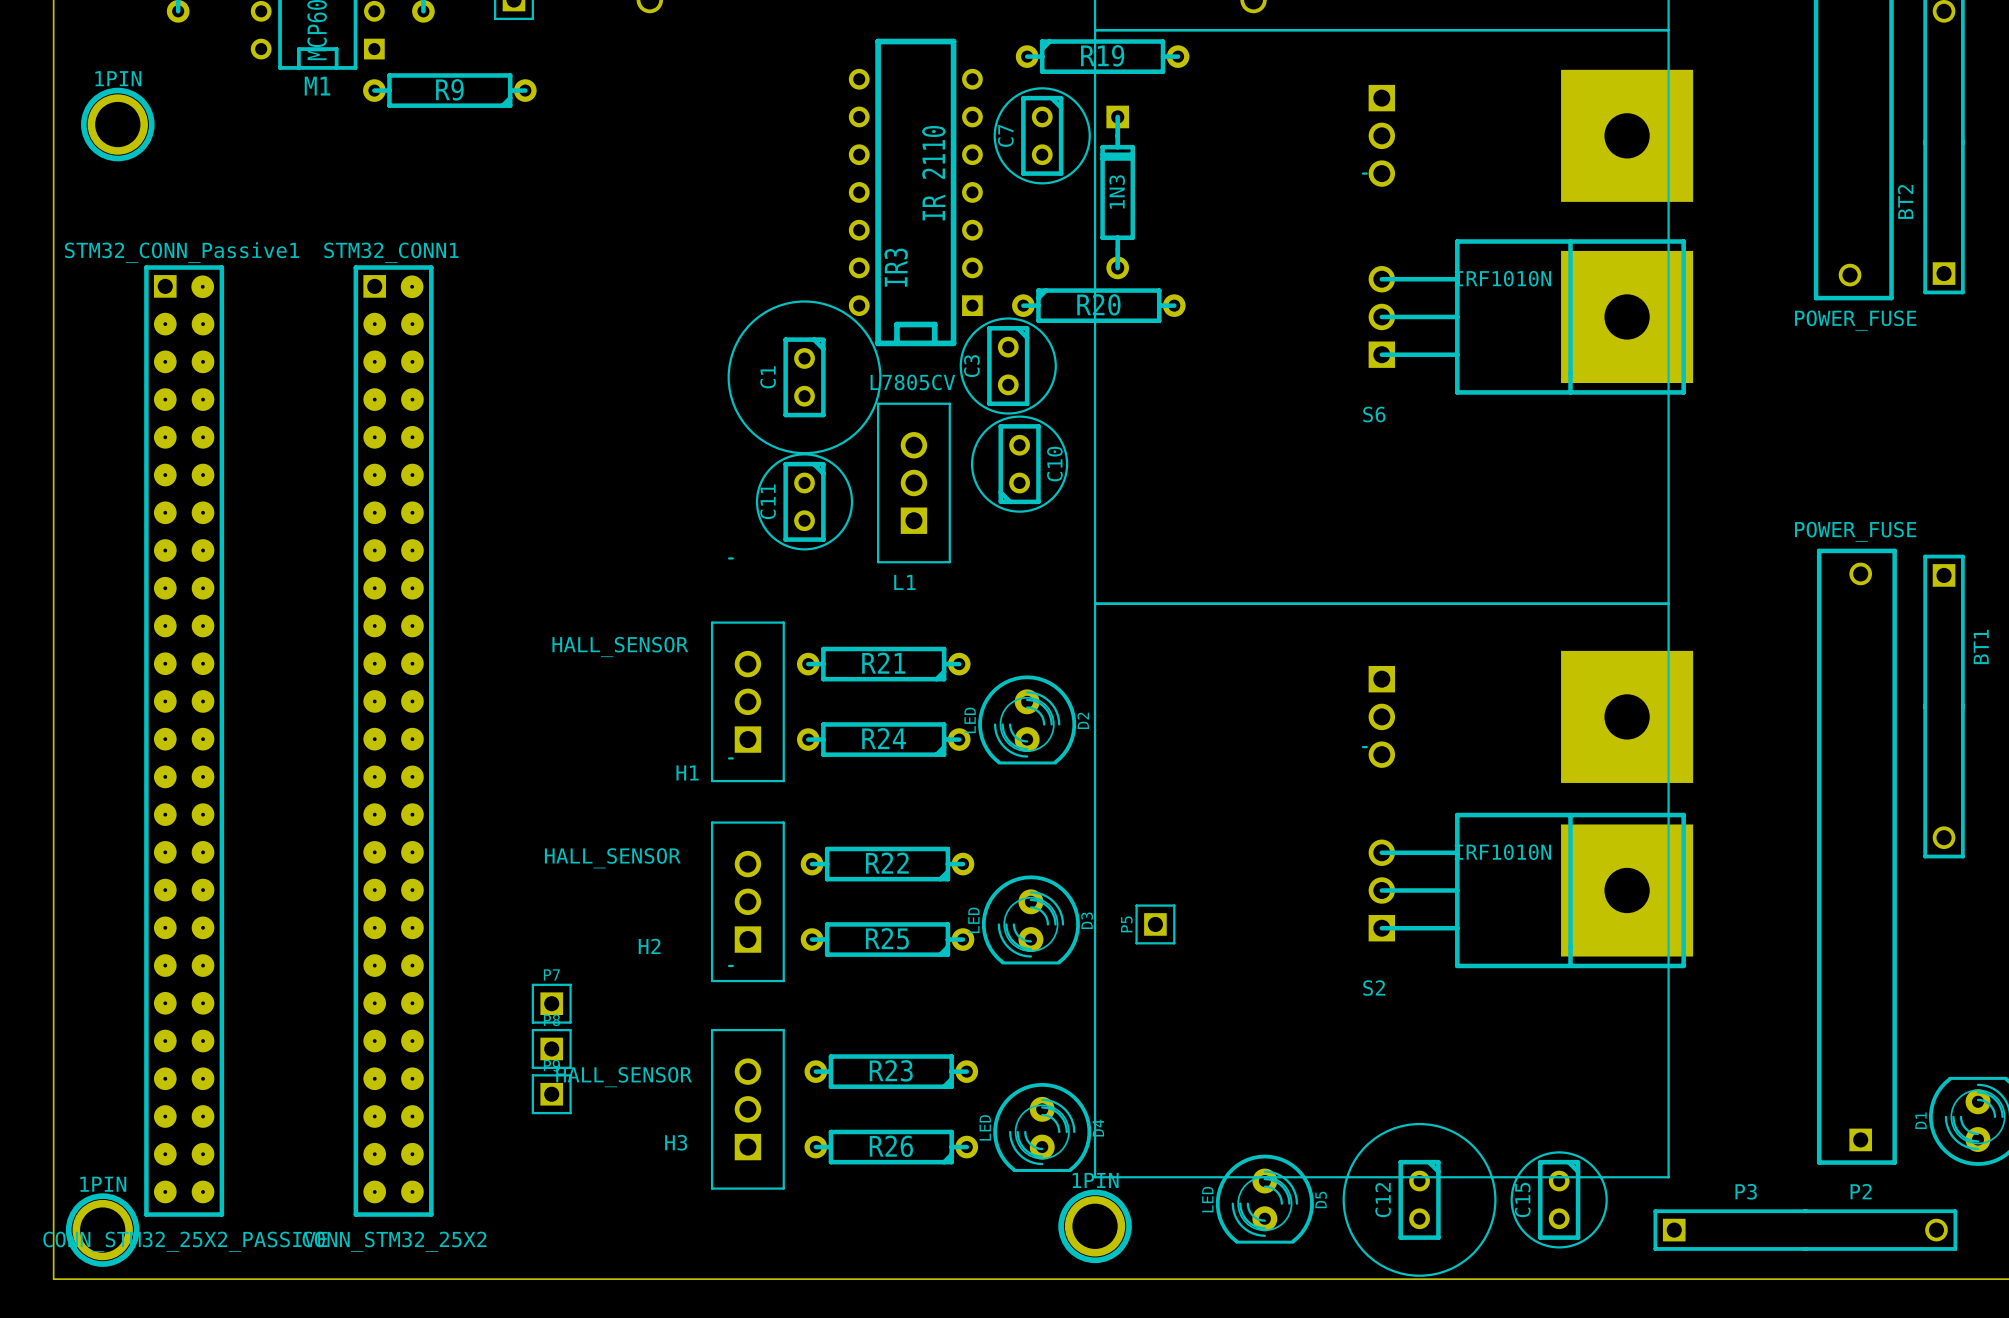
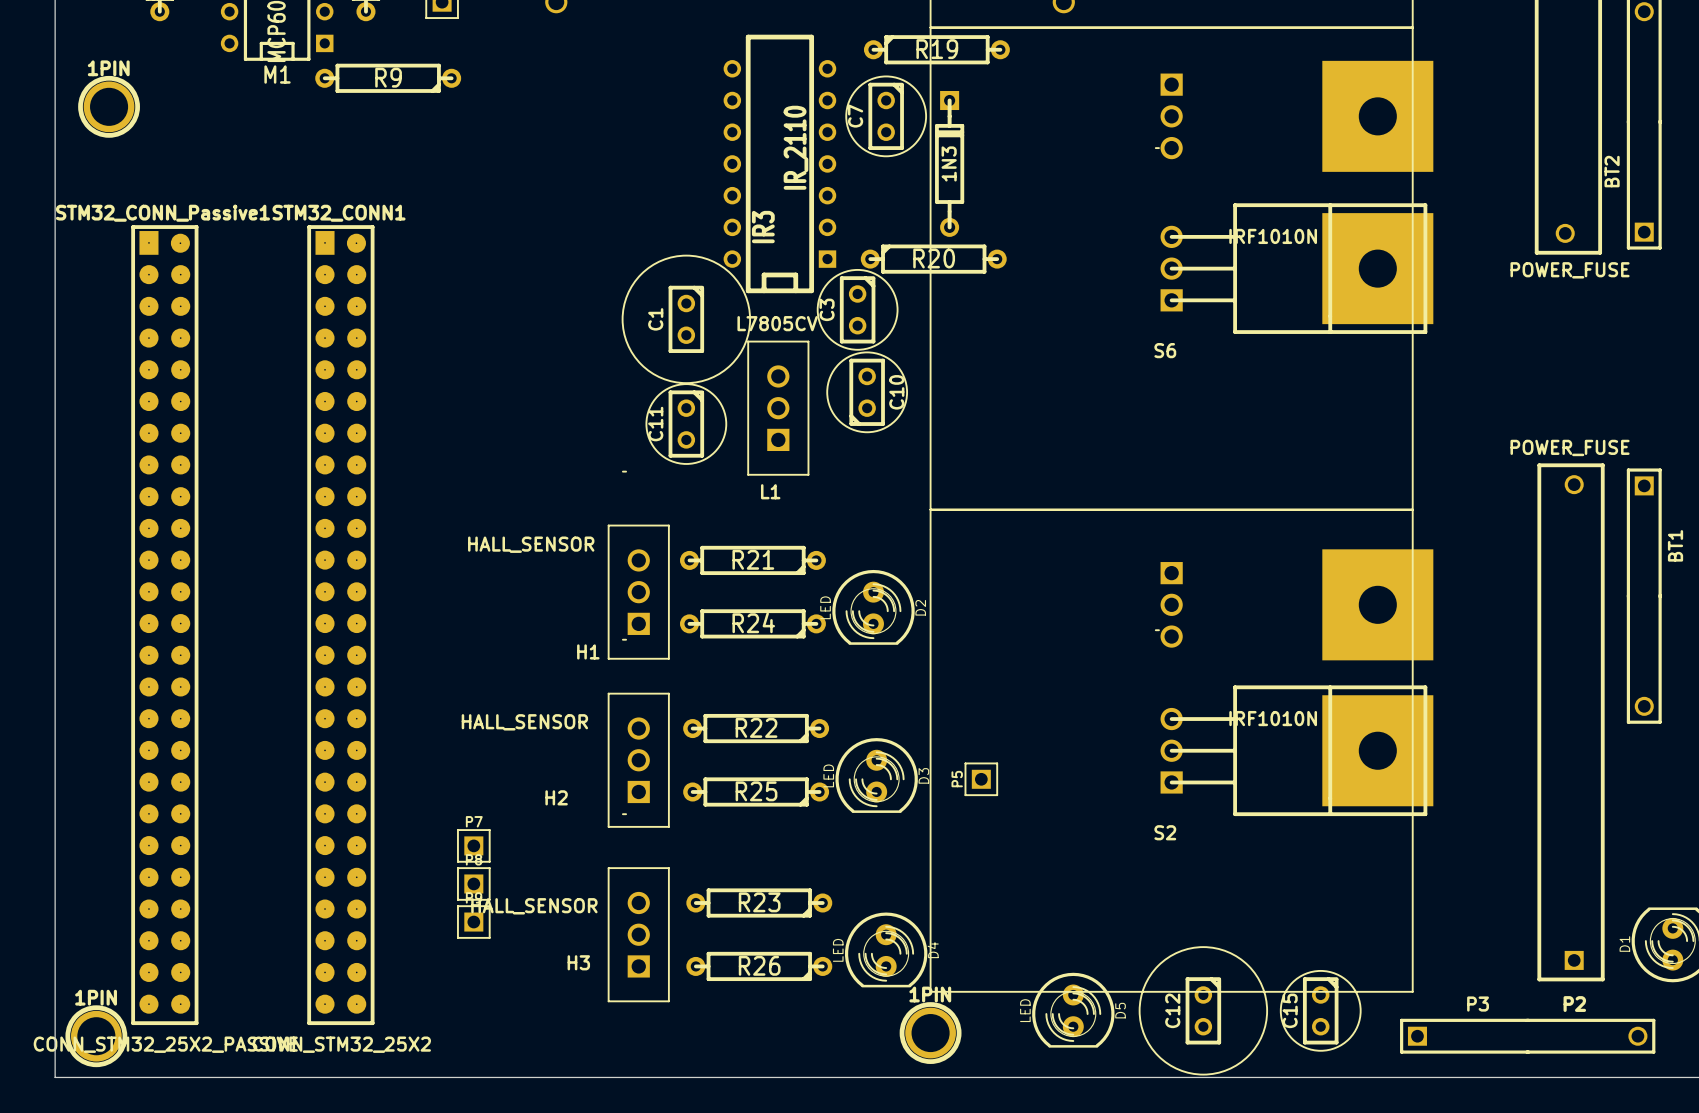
STM32_CONN_Passive1 footprint: [144, 265, 225, 1217] -> [131, 225, 199, 1026]
STM32_CONN1 footprint: [353, 265, 434, 1217] -> [307, 225, 375, 1026]

